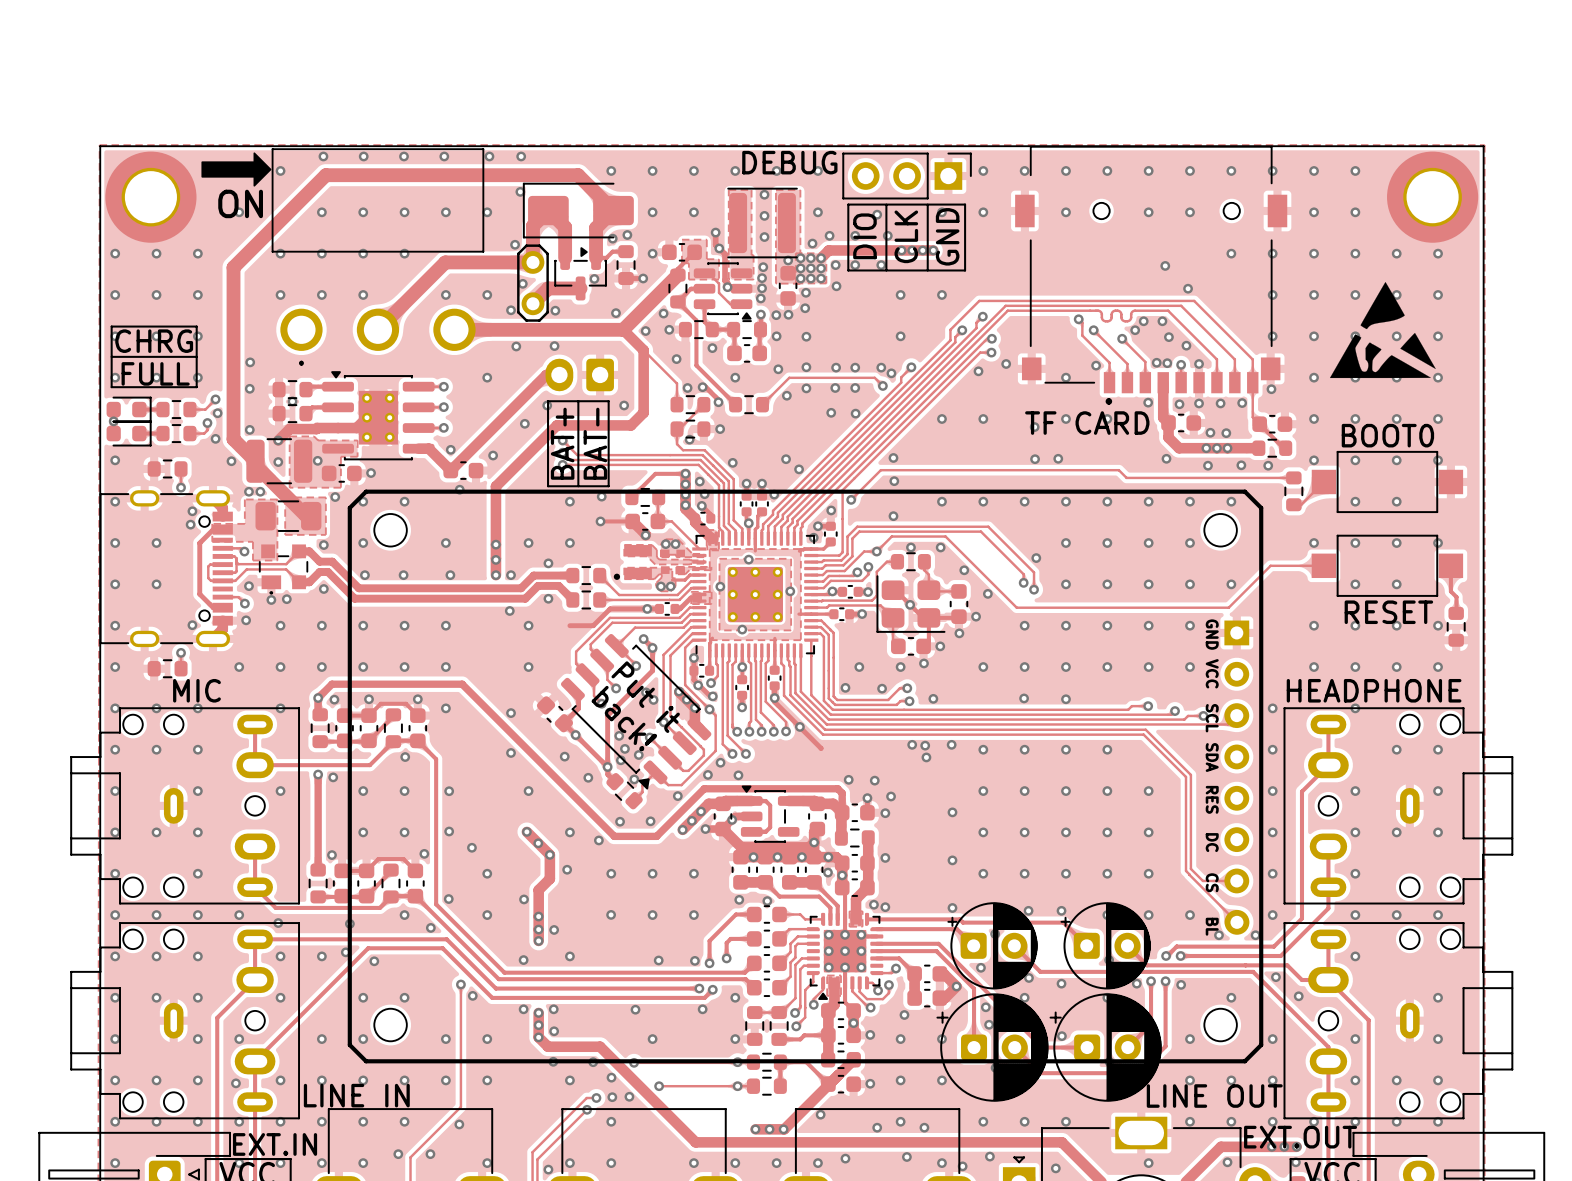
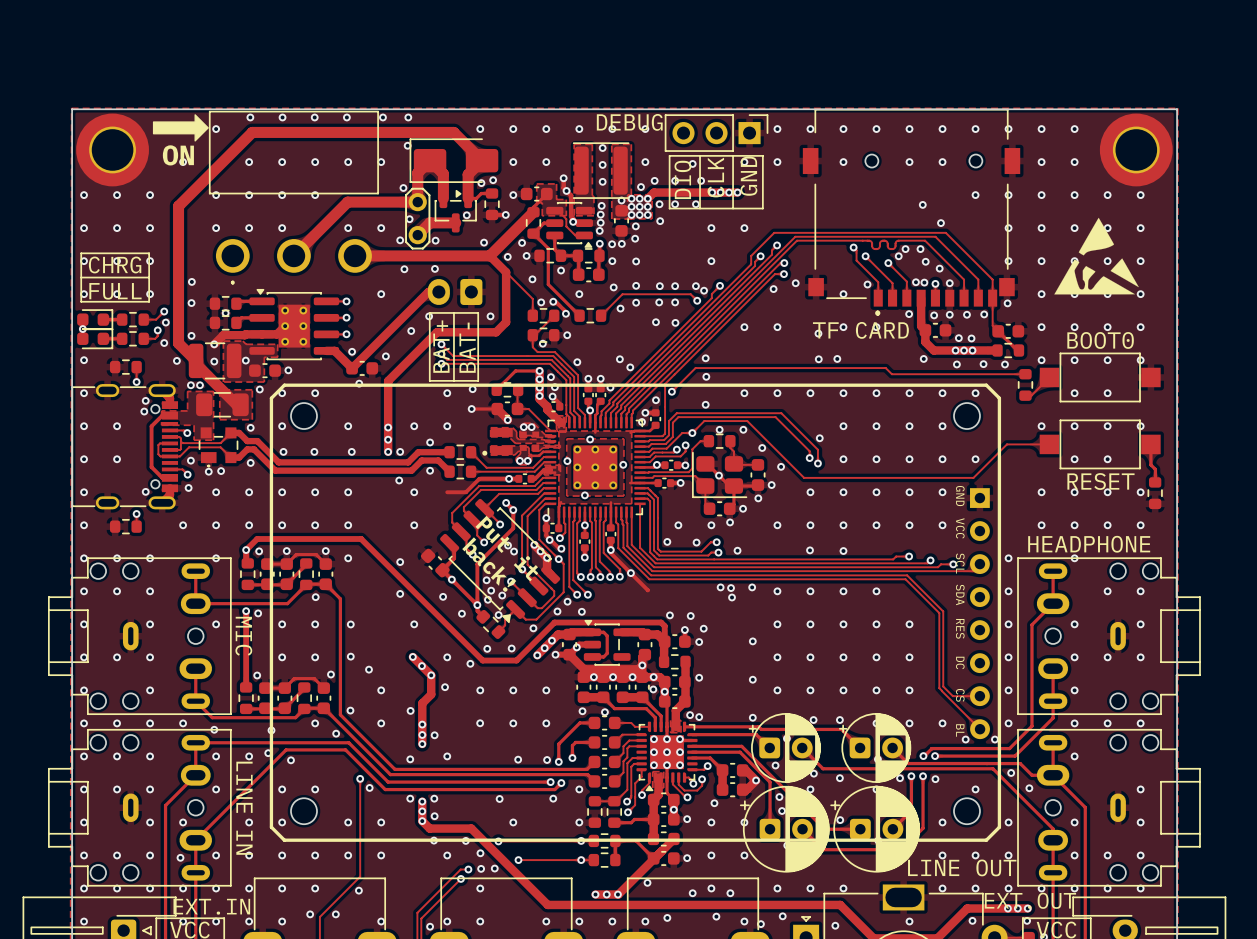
text rotation: 0° (196, 690) -> 90° clockwise (243, 636)
text position: MIC (196, 690) -> MIC (243, 636)
text rotation: 0° (356, 1095) -> 90° clockwise (244, 808)

